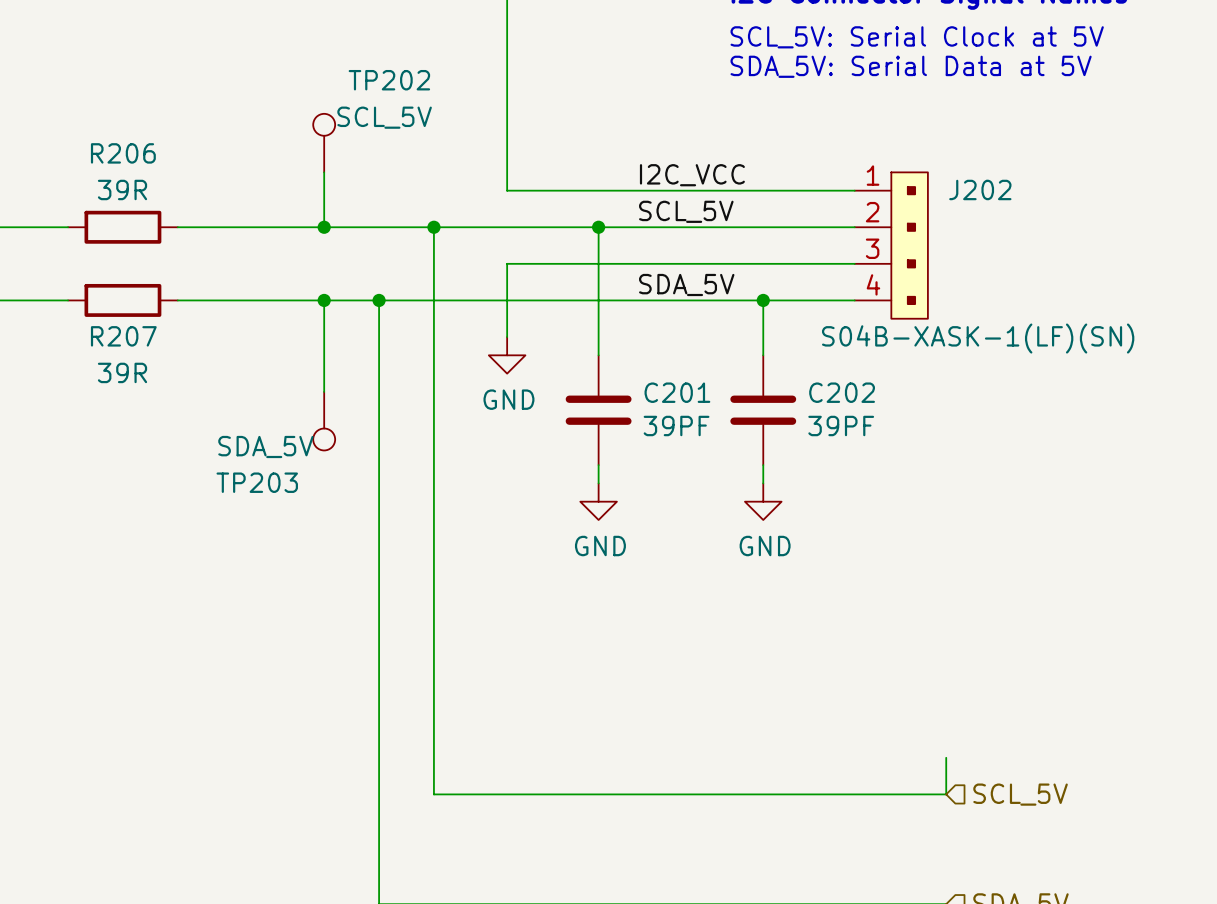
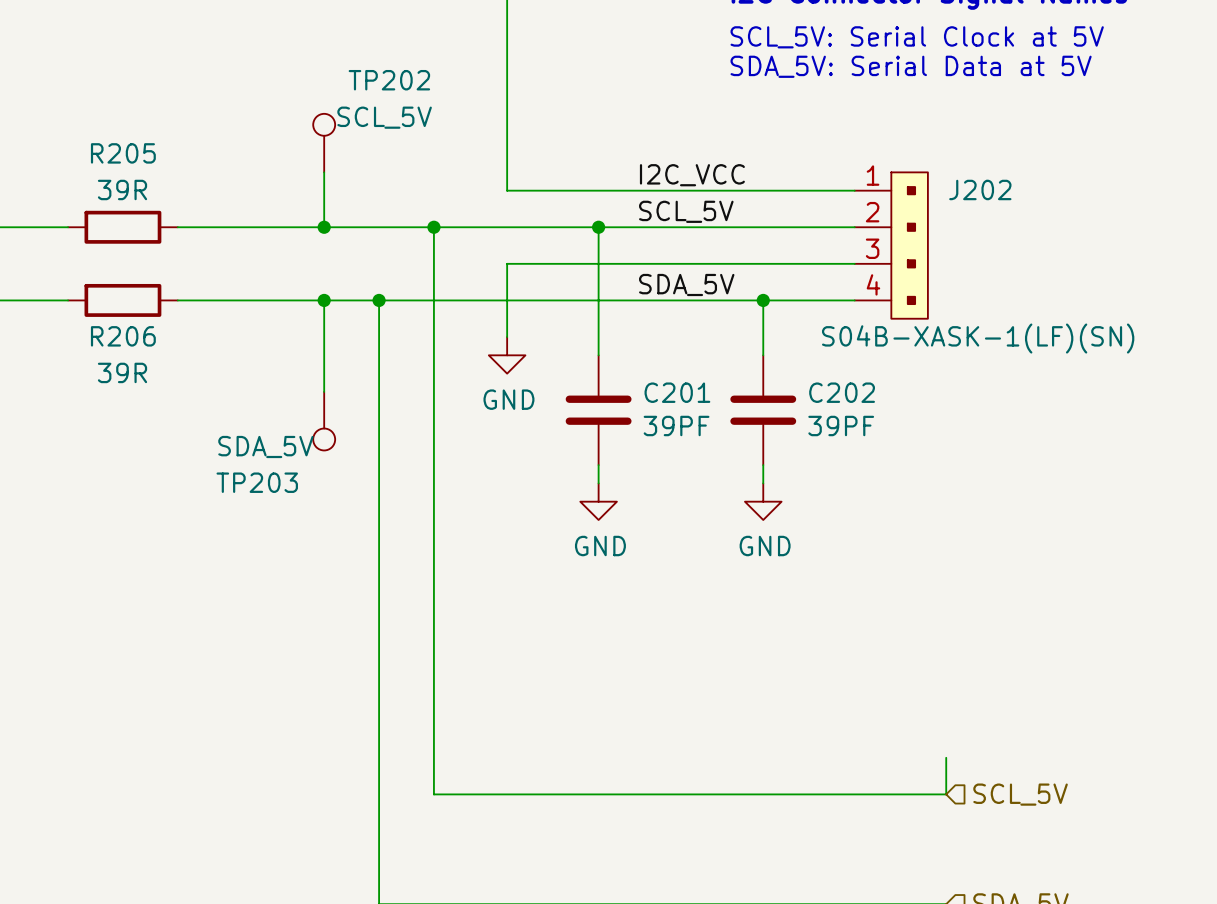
R206 name: R206 (123, 153) -> R205 (123, 153)
R207 name: R207 (123, 336) -> R206 (123, 336)

